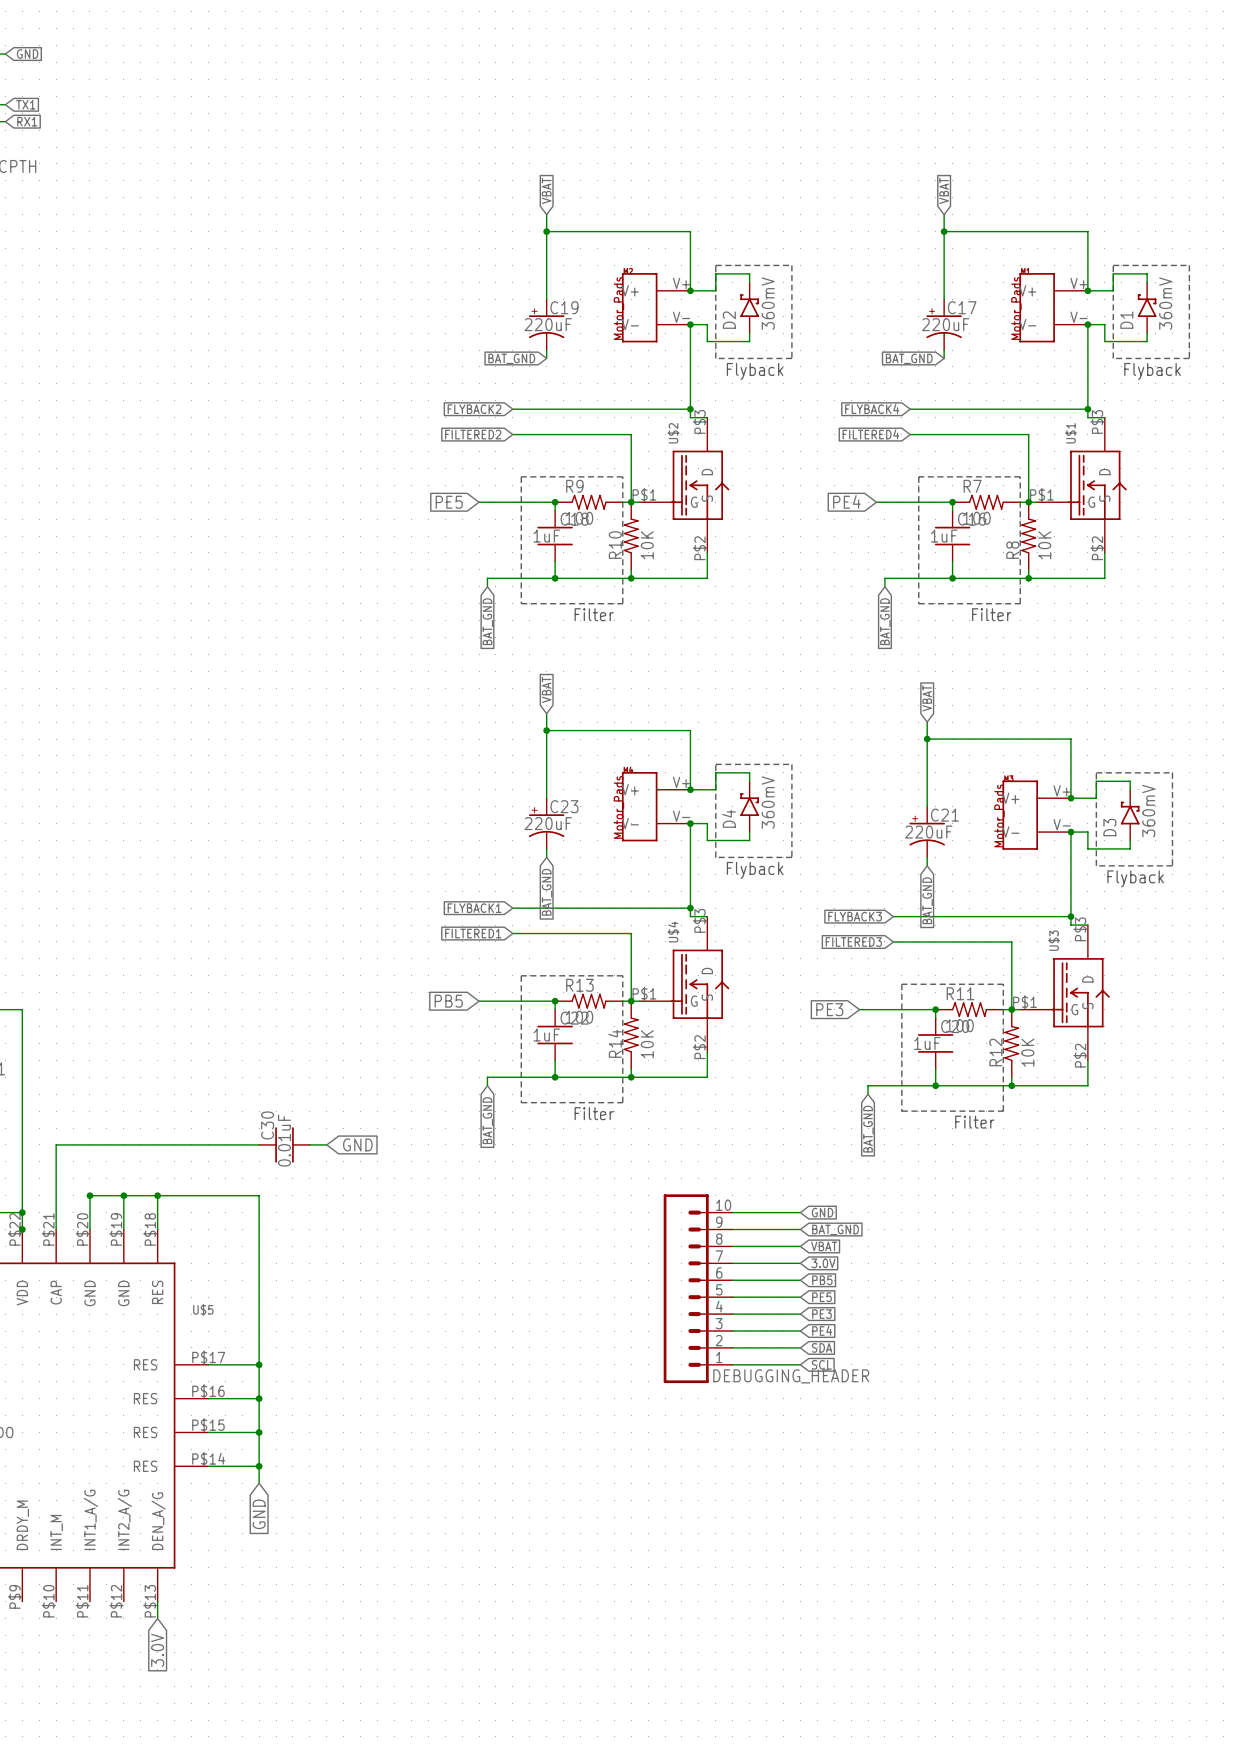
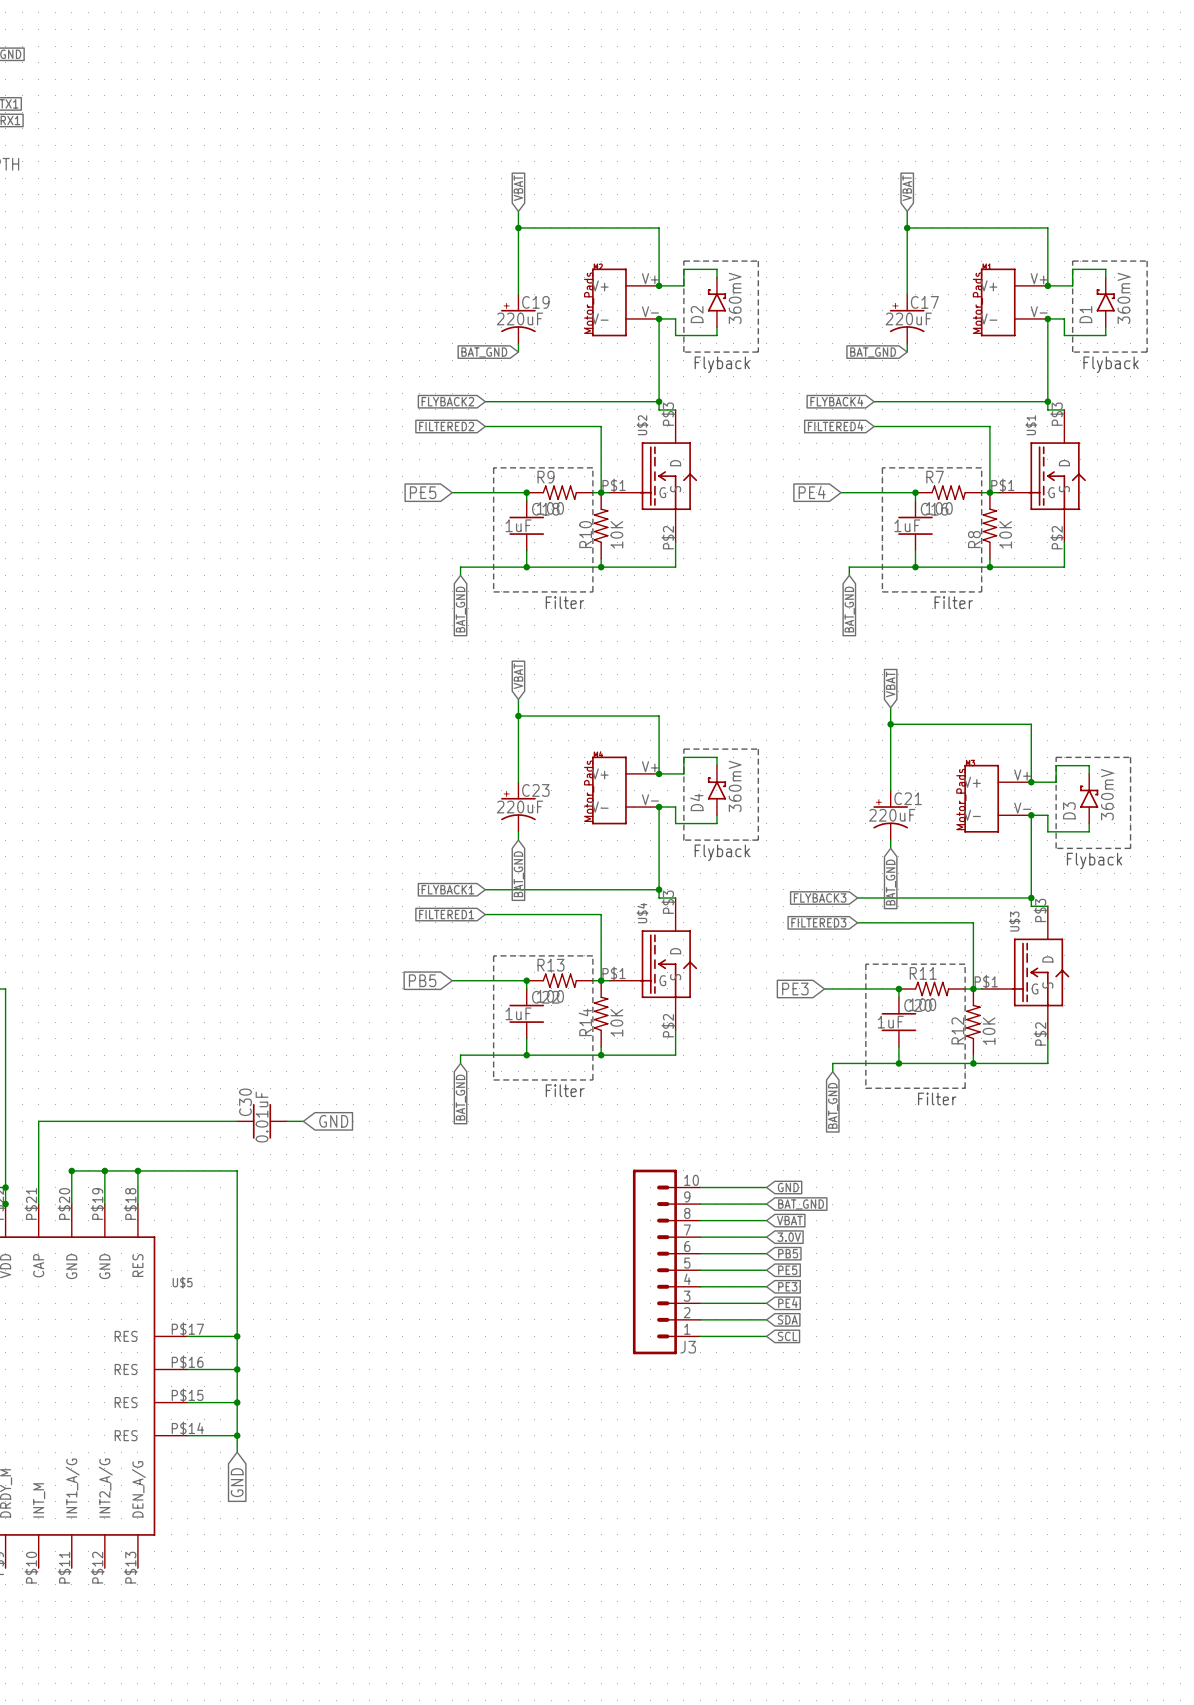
DEBUGGING_HEADER name: DEBUGGING_HEADER (791, 1376) -> J3 (688, 1347)
wire: (157, 1601) (157, 1618) -> none
global label: 3.0V (157, 1650) -> none

